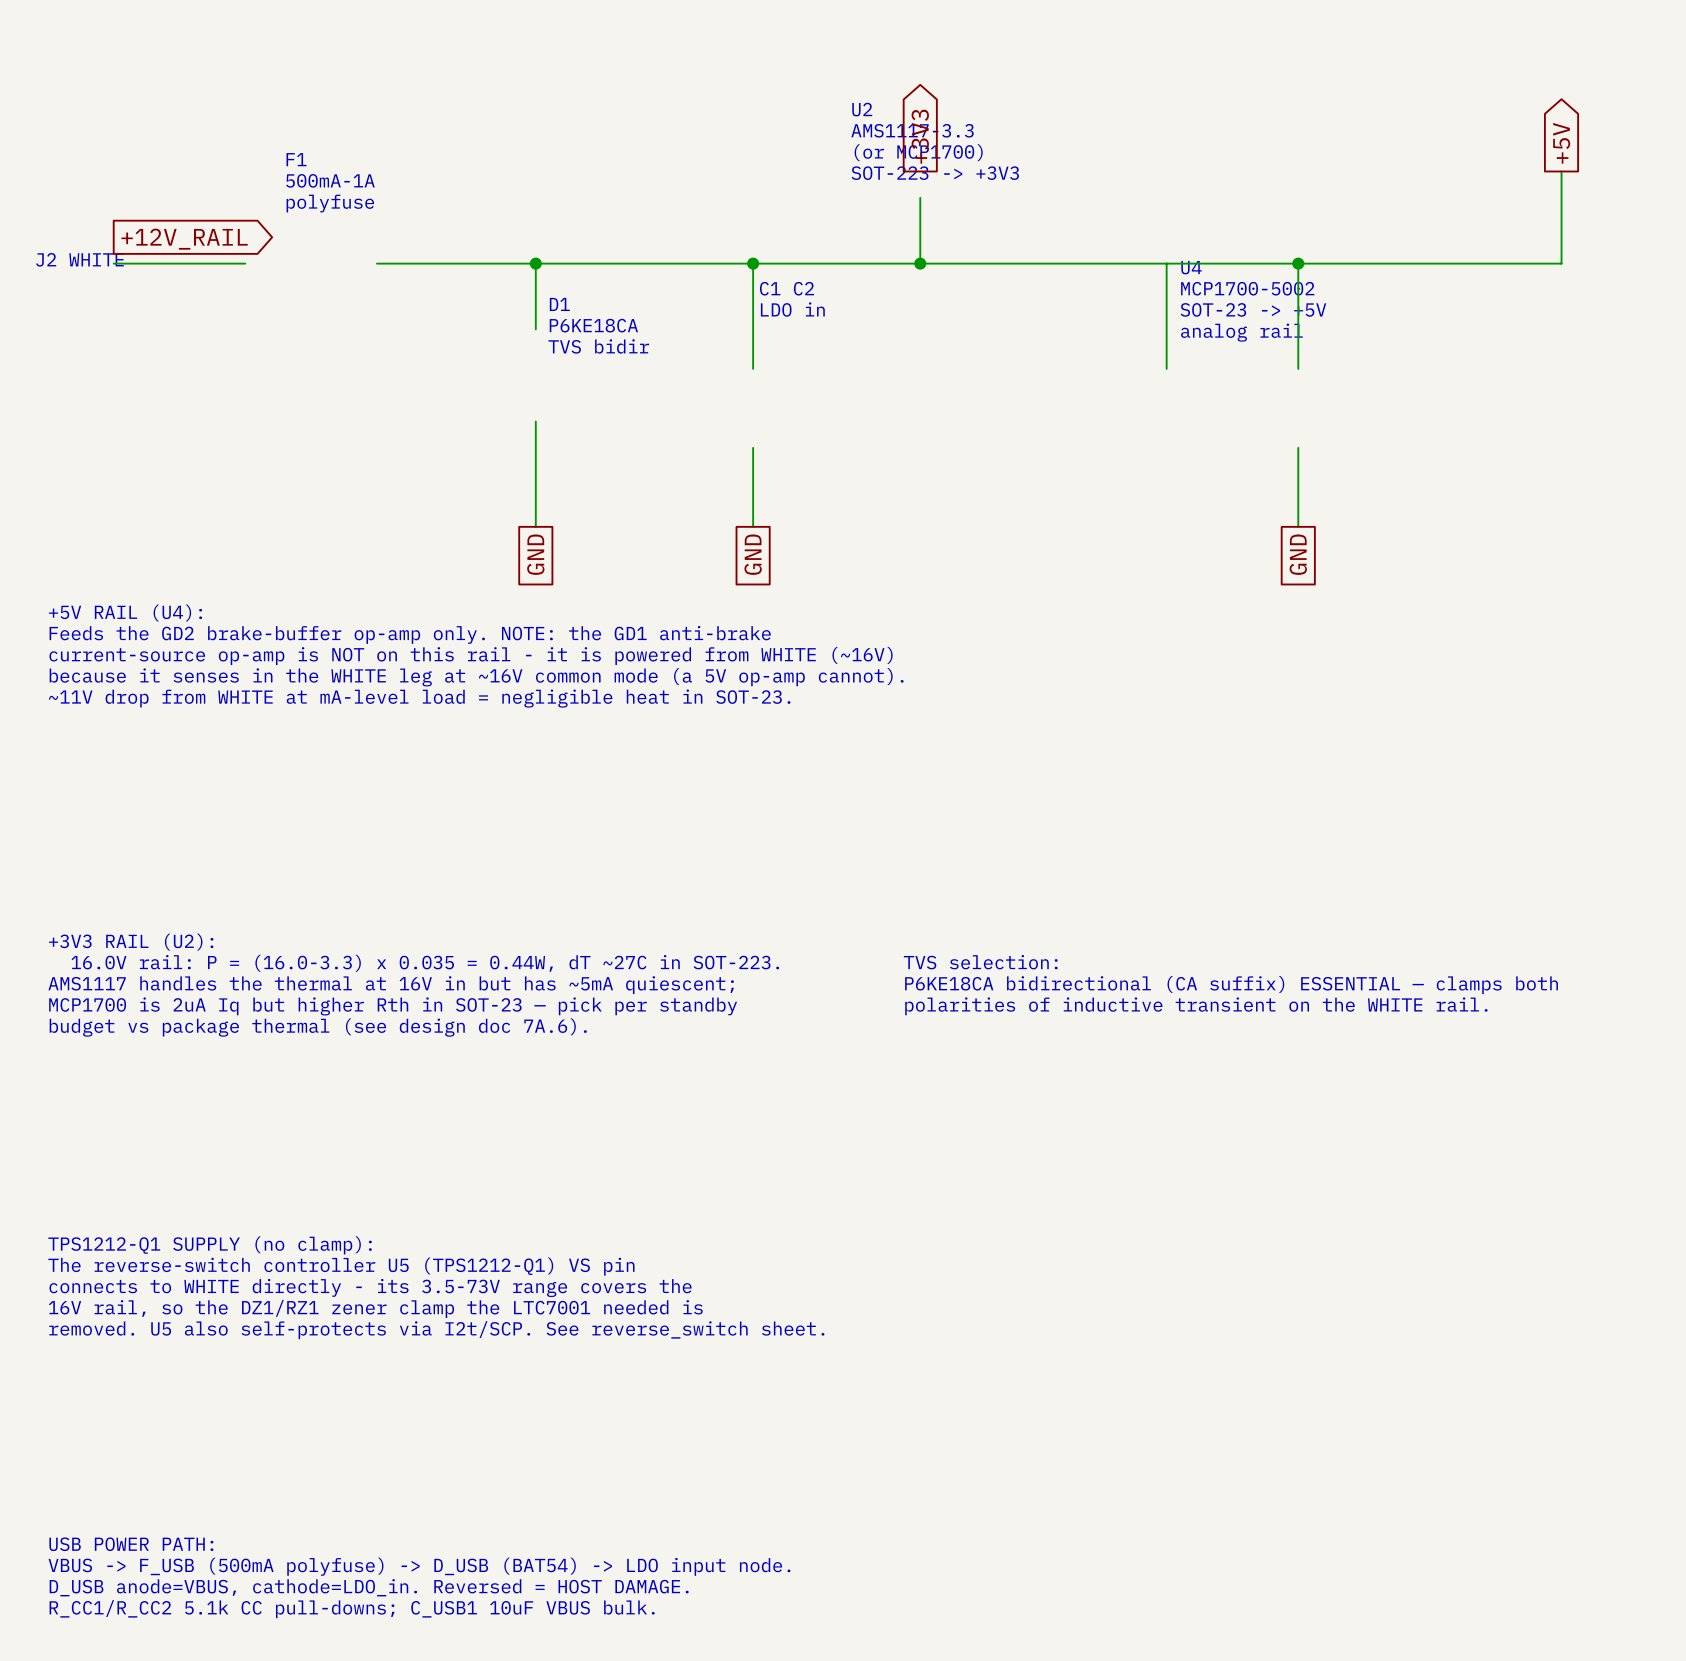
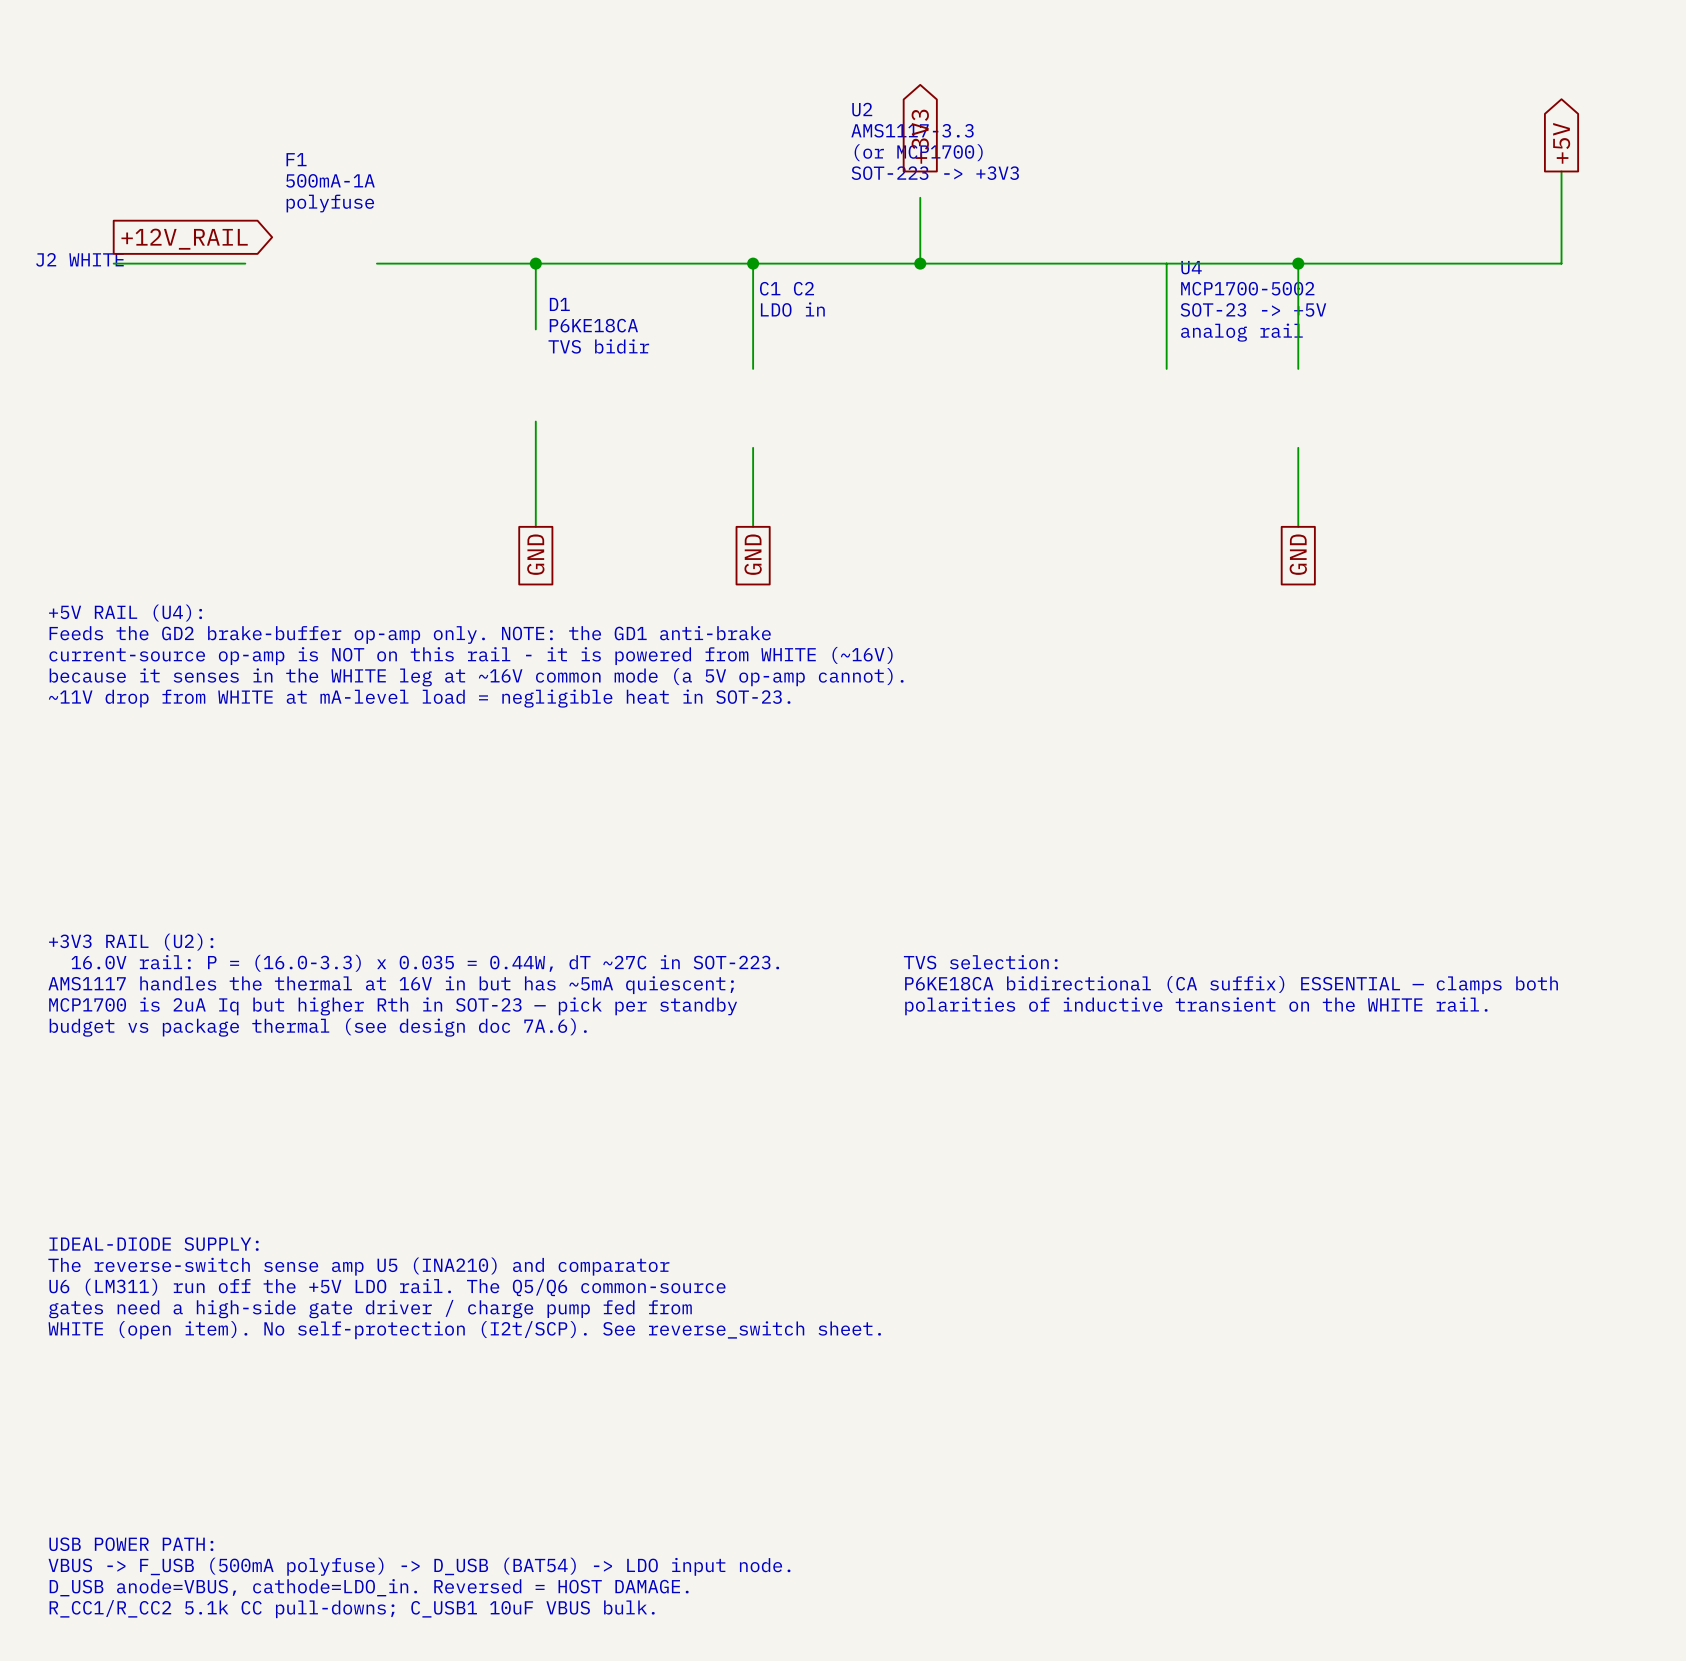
text: TPS1212-Q1 SUPPLY (no clamp): (210, 1245) -> IDEAL-DIODE SUPPLY: (154, 1244)
text: The reverse-switch controller U5 (TPS1212-Q1) VS pin (341, 1266) -> The reverse-switch sense amp U5 (INA210) and comparator (358, 1266)
text: connects to WHITE directly - its 3.5-73V range covers the (370, 1287) -> U6 (LM311) run off the +5V LDO rail. The Q5/Q6 common-source (387, 1287)
text: 16V rail, so the DZ1/RZ1 zener clamp the LTC7001 needed is (375, 1308) -> gates need a high-side gate driver / charge pump fed from (370, 1309)
text: removed. U5 also self-protects via I2t/SCP. See reverse_switch sheet. (436, 1330) -> WHITE (open item). No self-protection (I2t/SCP). See reverse_switch sheet. (464, 1330)

